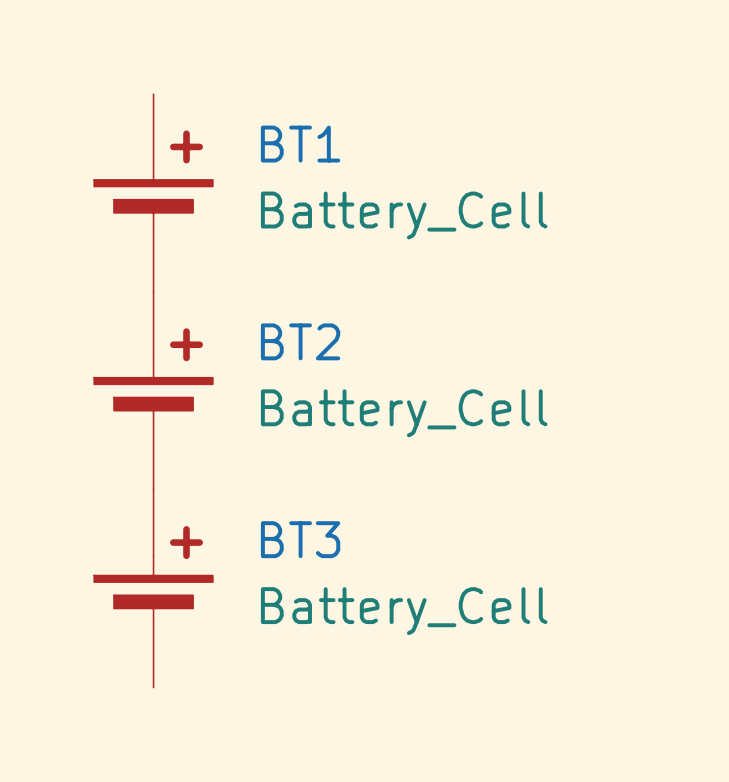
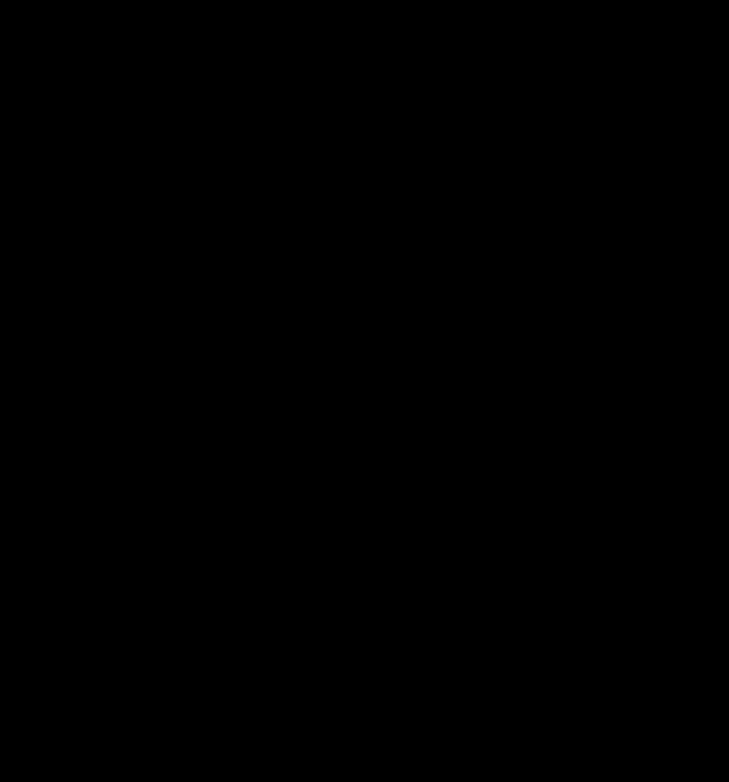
BT1: Battery_Cell (153, 193) -> none
BT2: Battery_Cell (153, 390) -> none
BT3: Battery_Cell (153, 588) -> none

